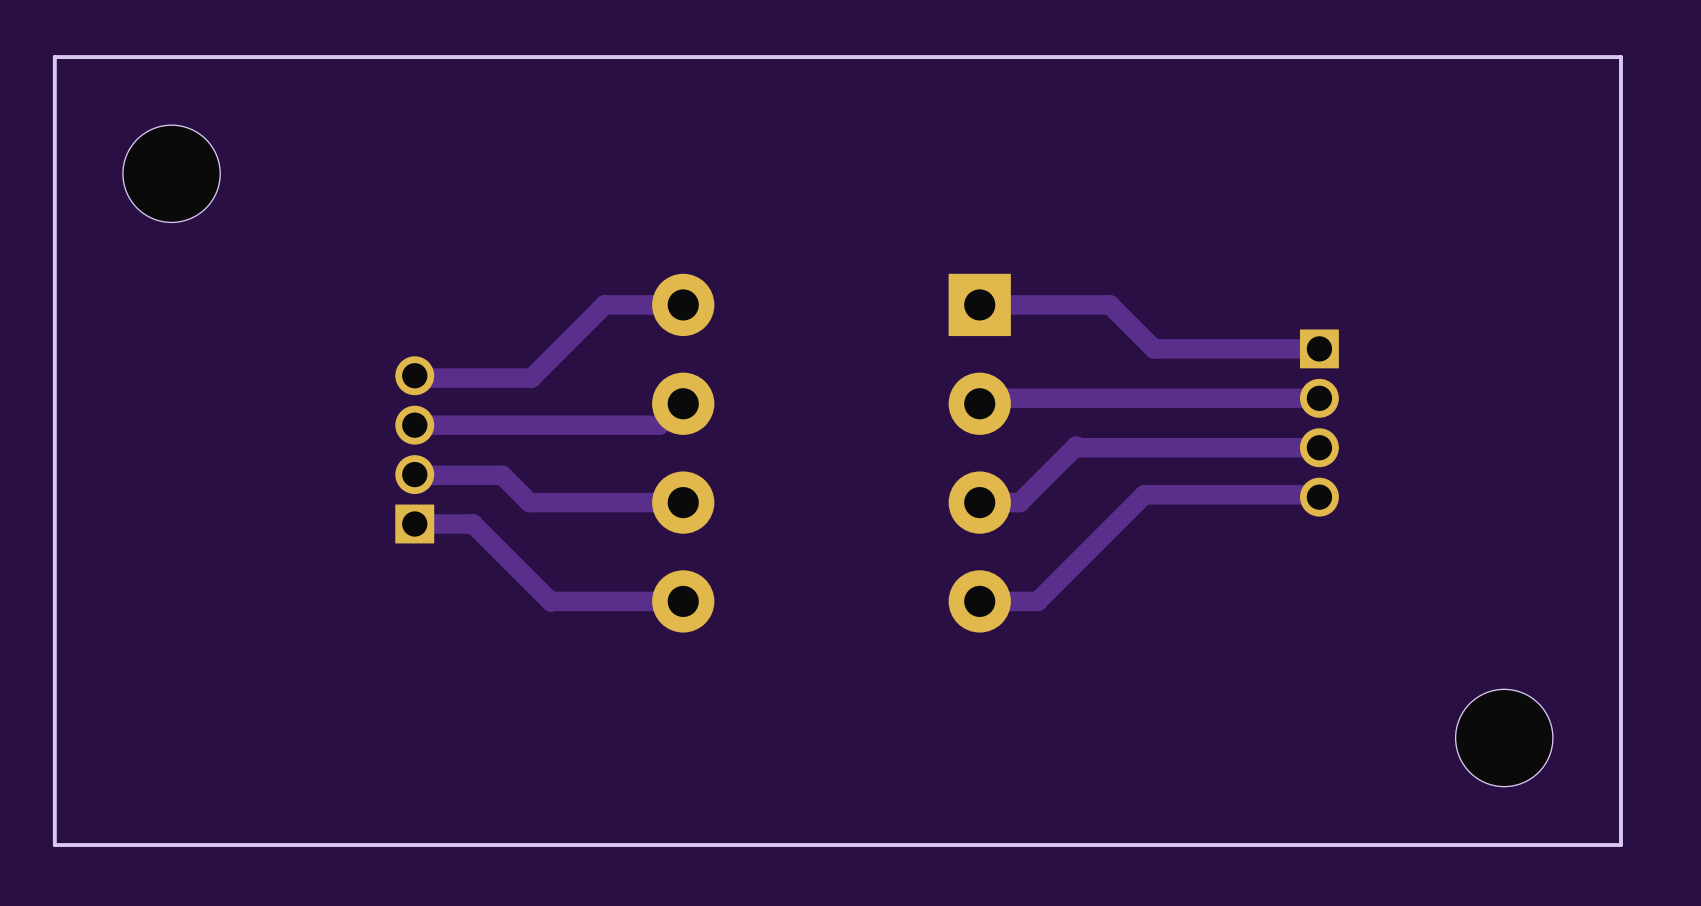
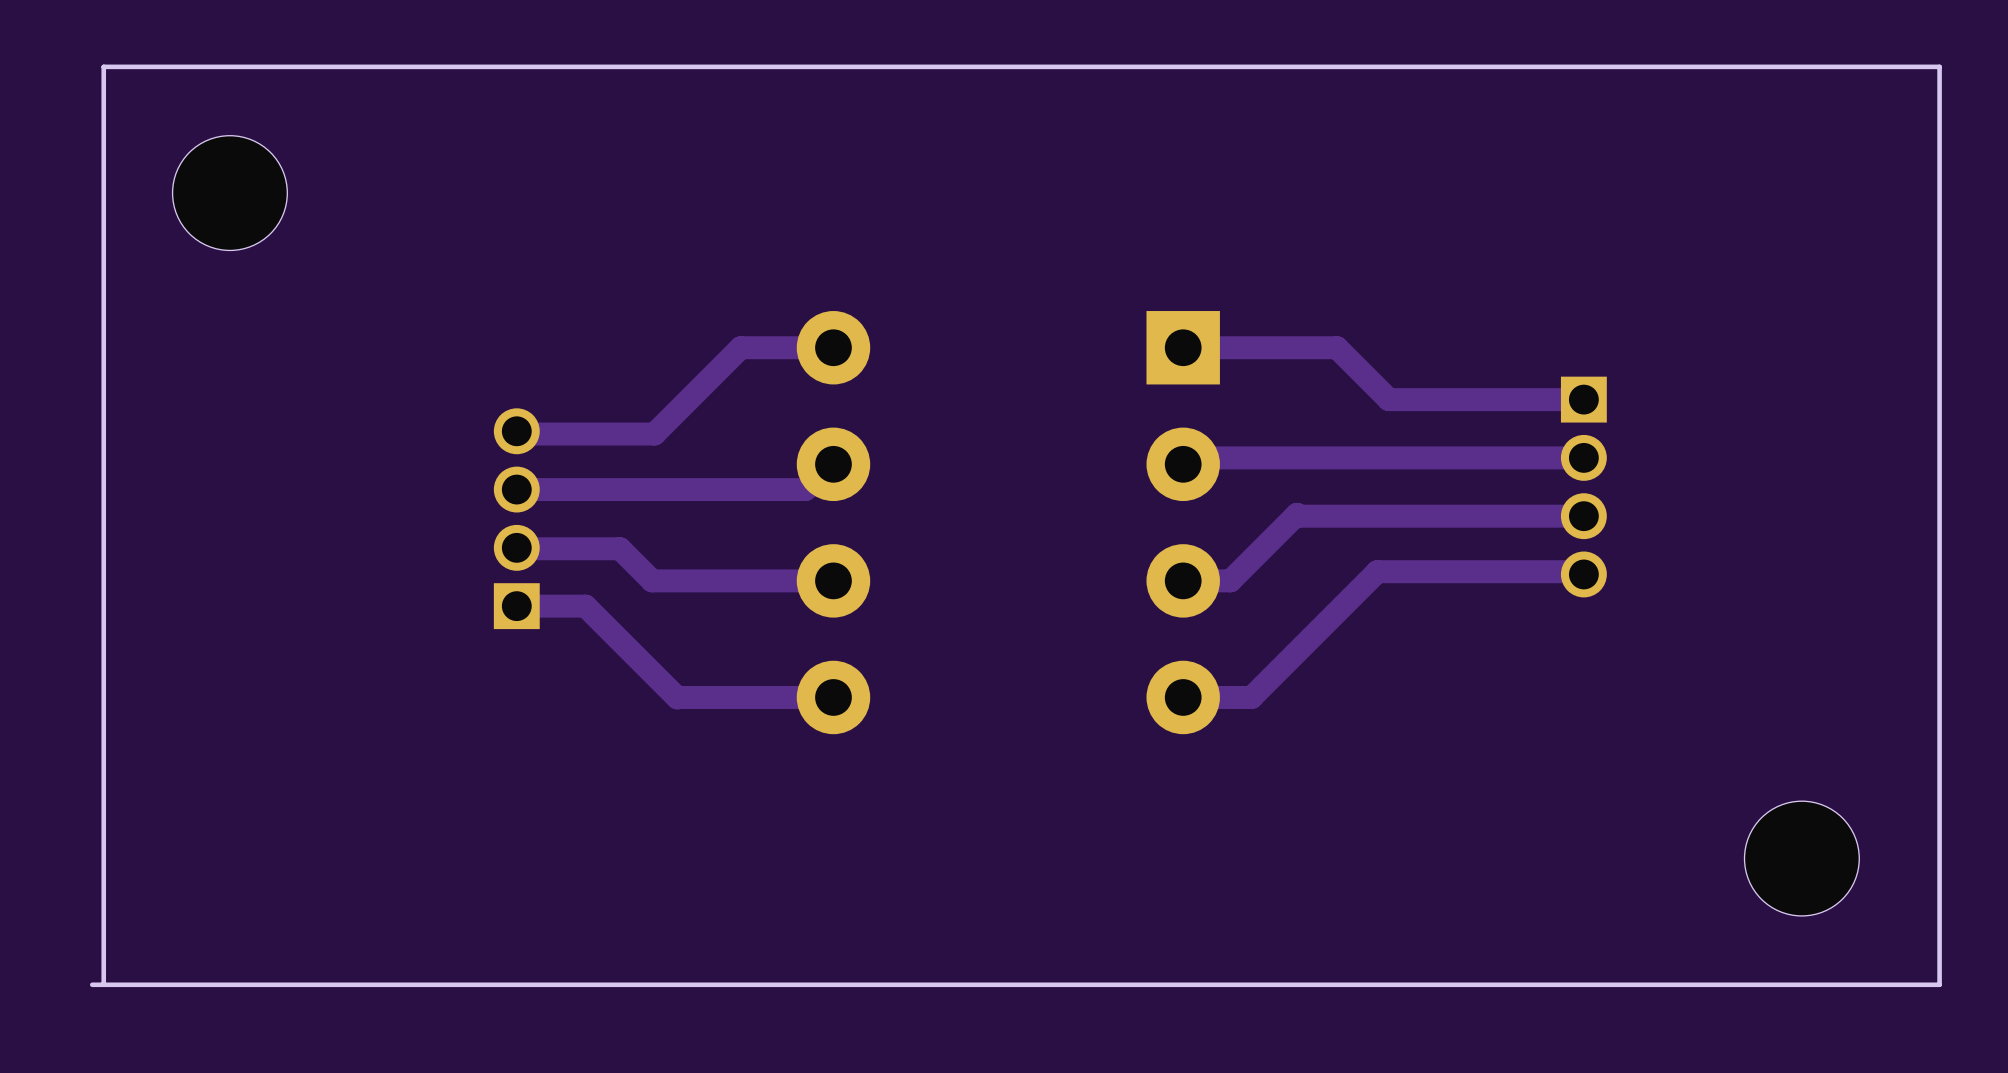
board edge: (1620, 66) (1620, 57) (54, 57) (54, 845) -> (1939, 66) (103, 66) (103, 984)

